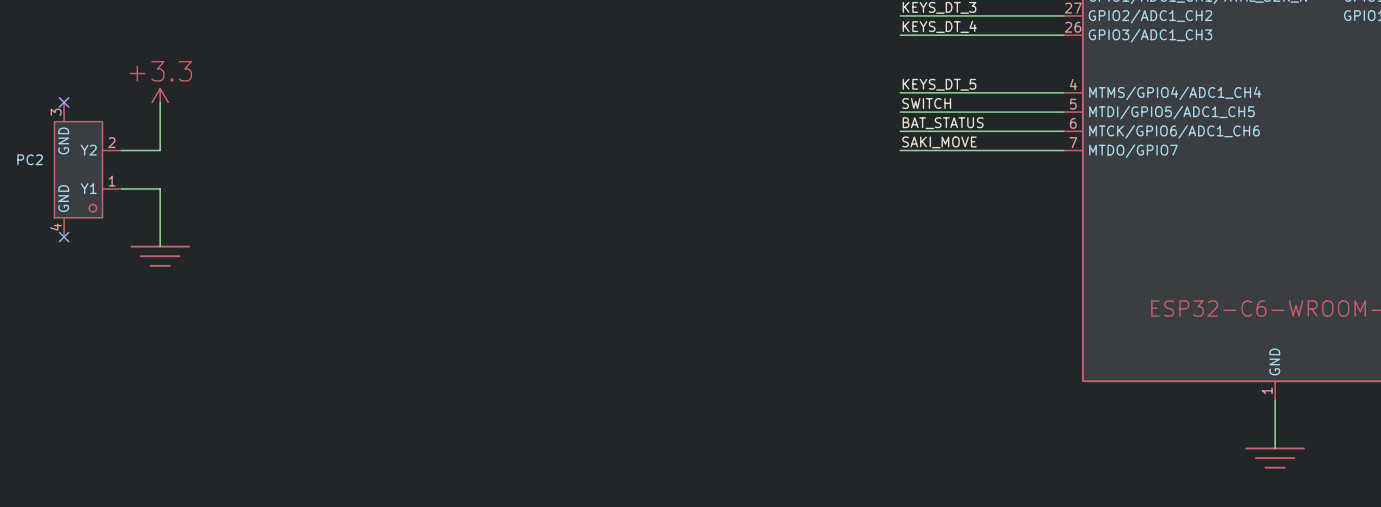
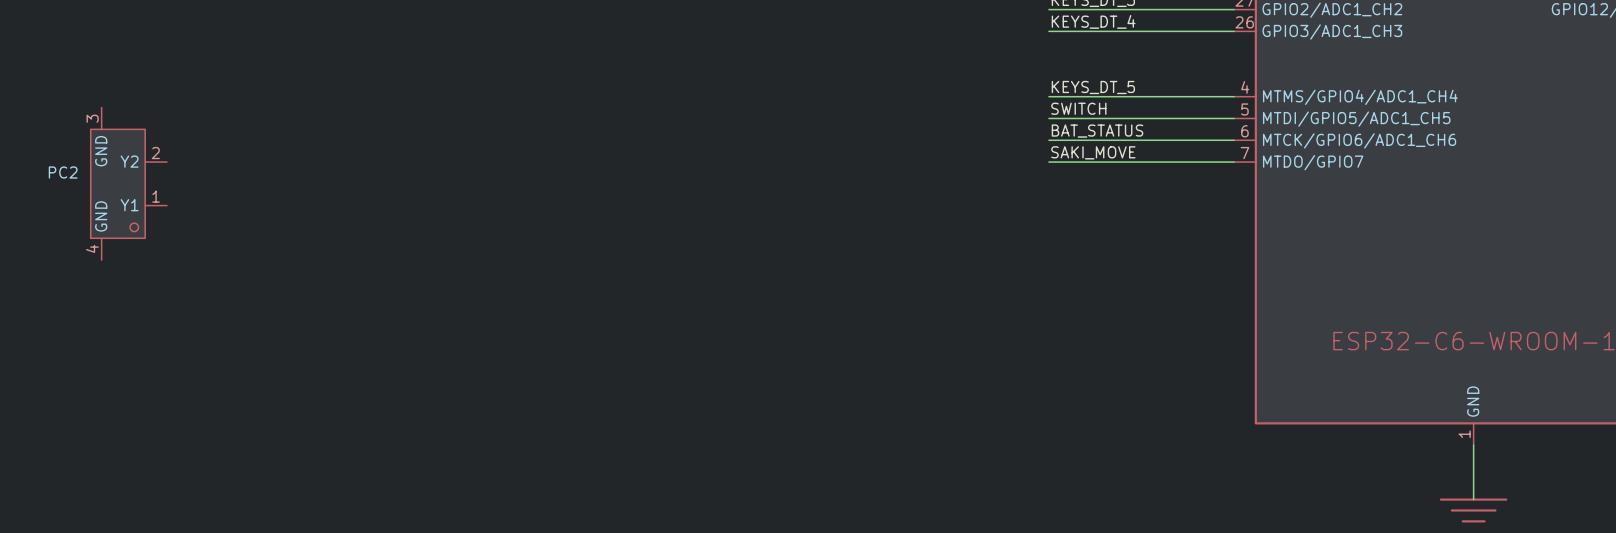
power symbol: (160, 95) -> none
no-connect mark: (64, 102) -> none
wire: (160, 102) (160, 150) (121, 150) -> none
wire: (121, 188) (160, 188) (160, 246) -> none
no-connect mark: (64, 237) -> none
power symbol: (160, 256) -> none

